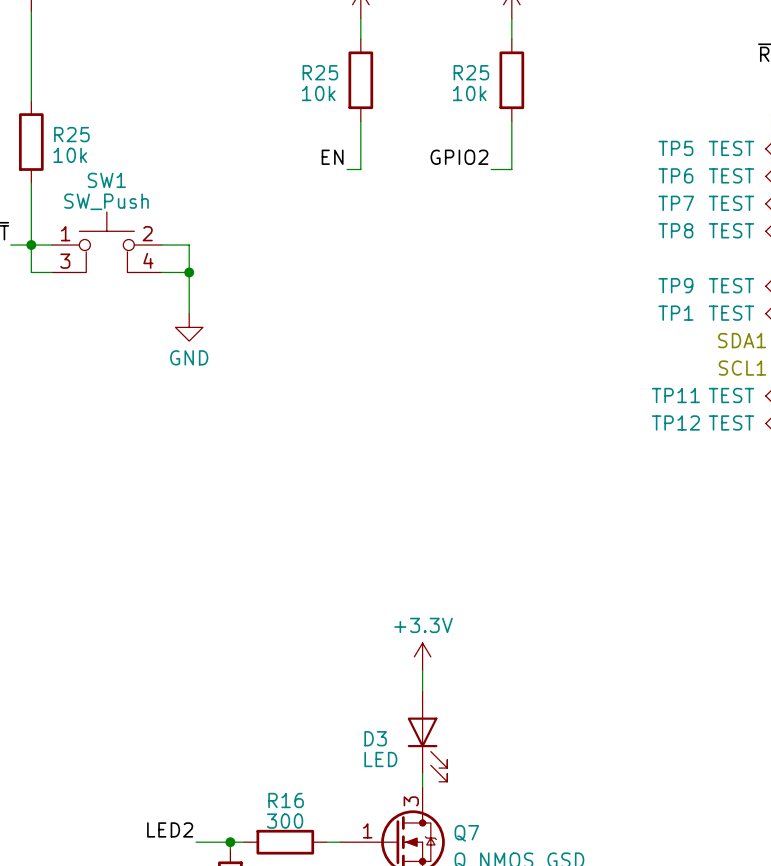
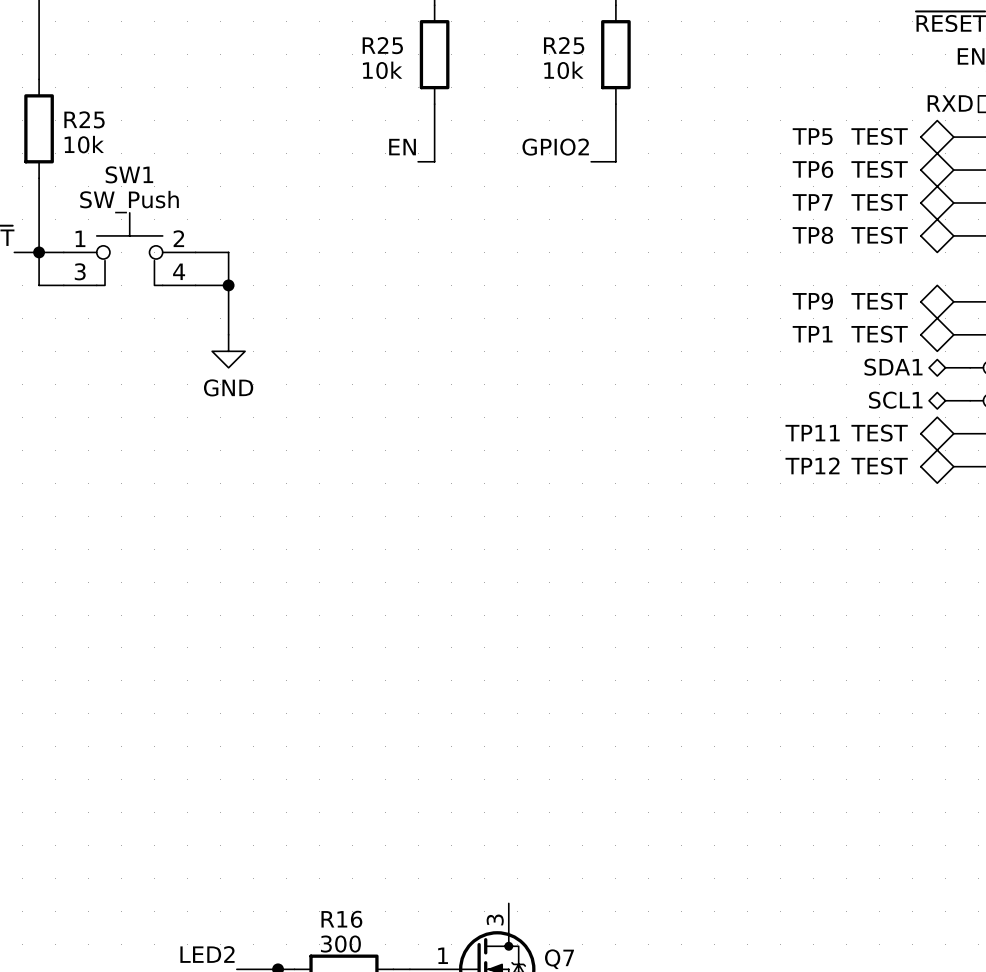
power symbol: +3.3V (422, 656) -> none
wire: (422, 670) (422, 691) -> none
D3: LED (427, 736) -> none
wire: (422, 773) (422, 787) -> none

